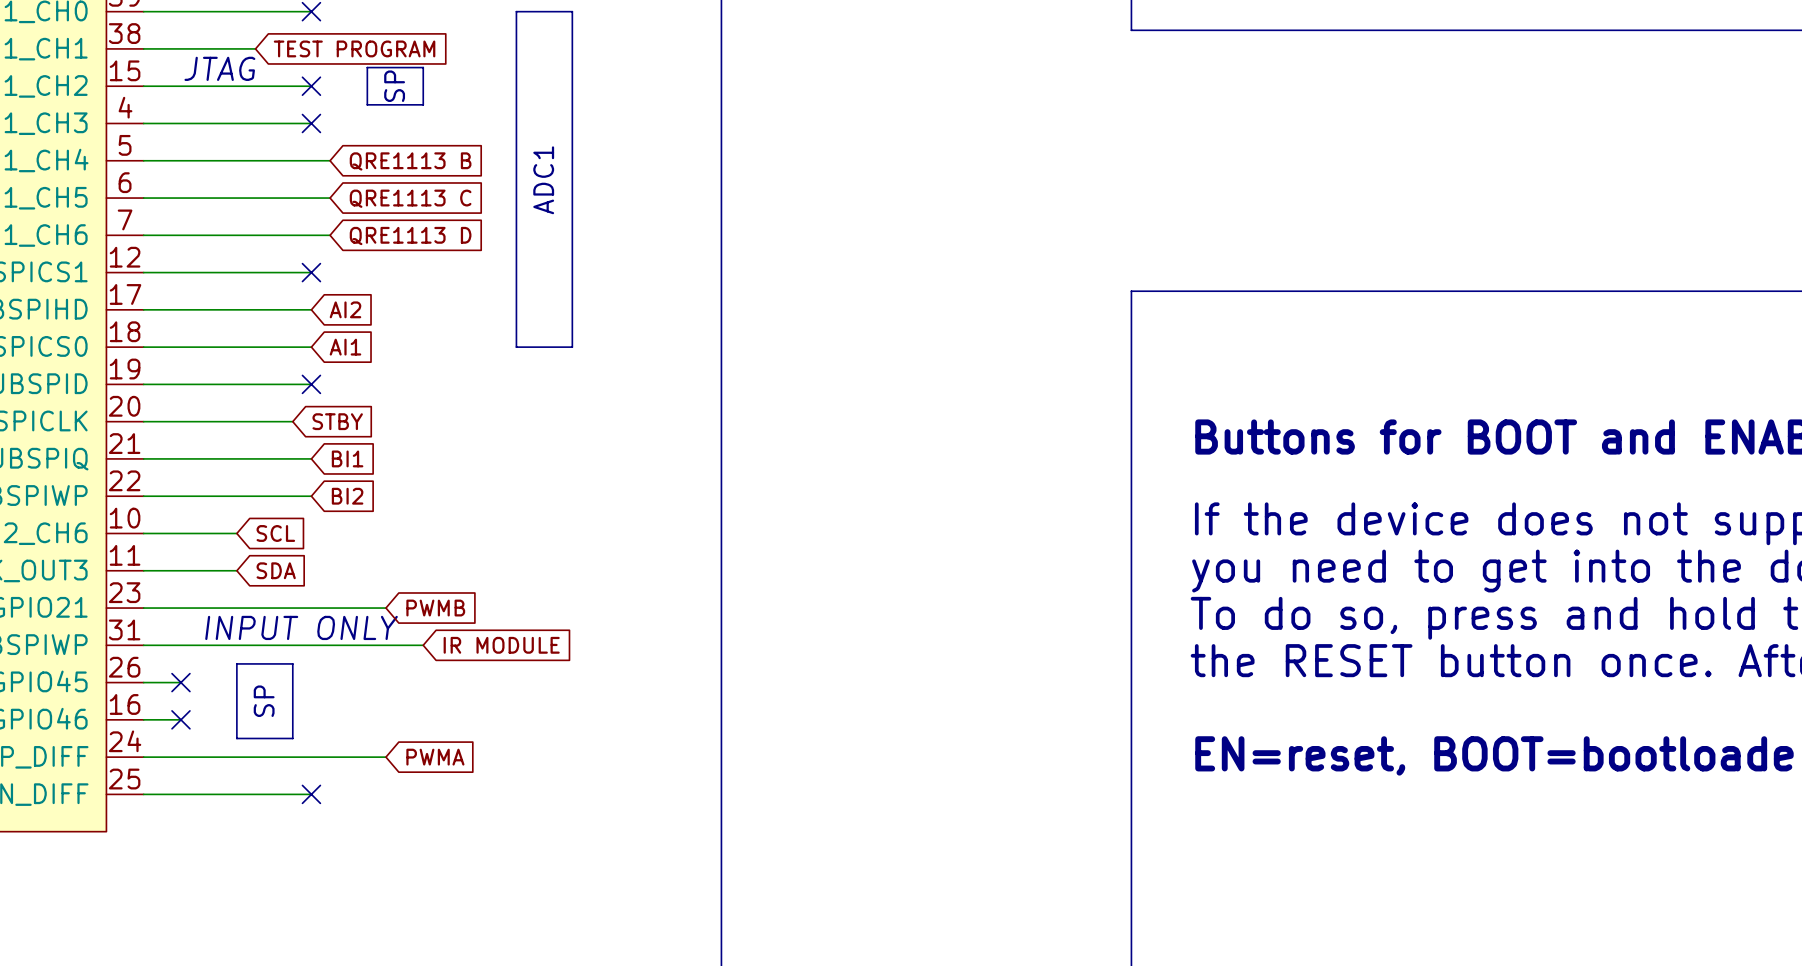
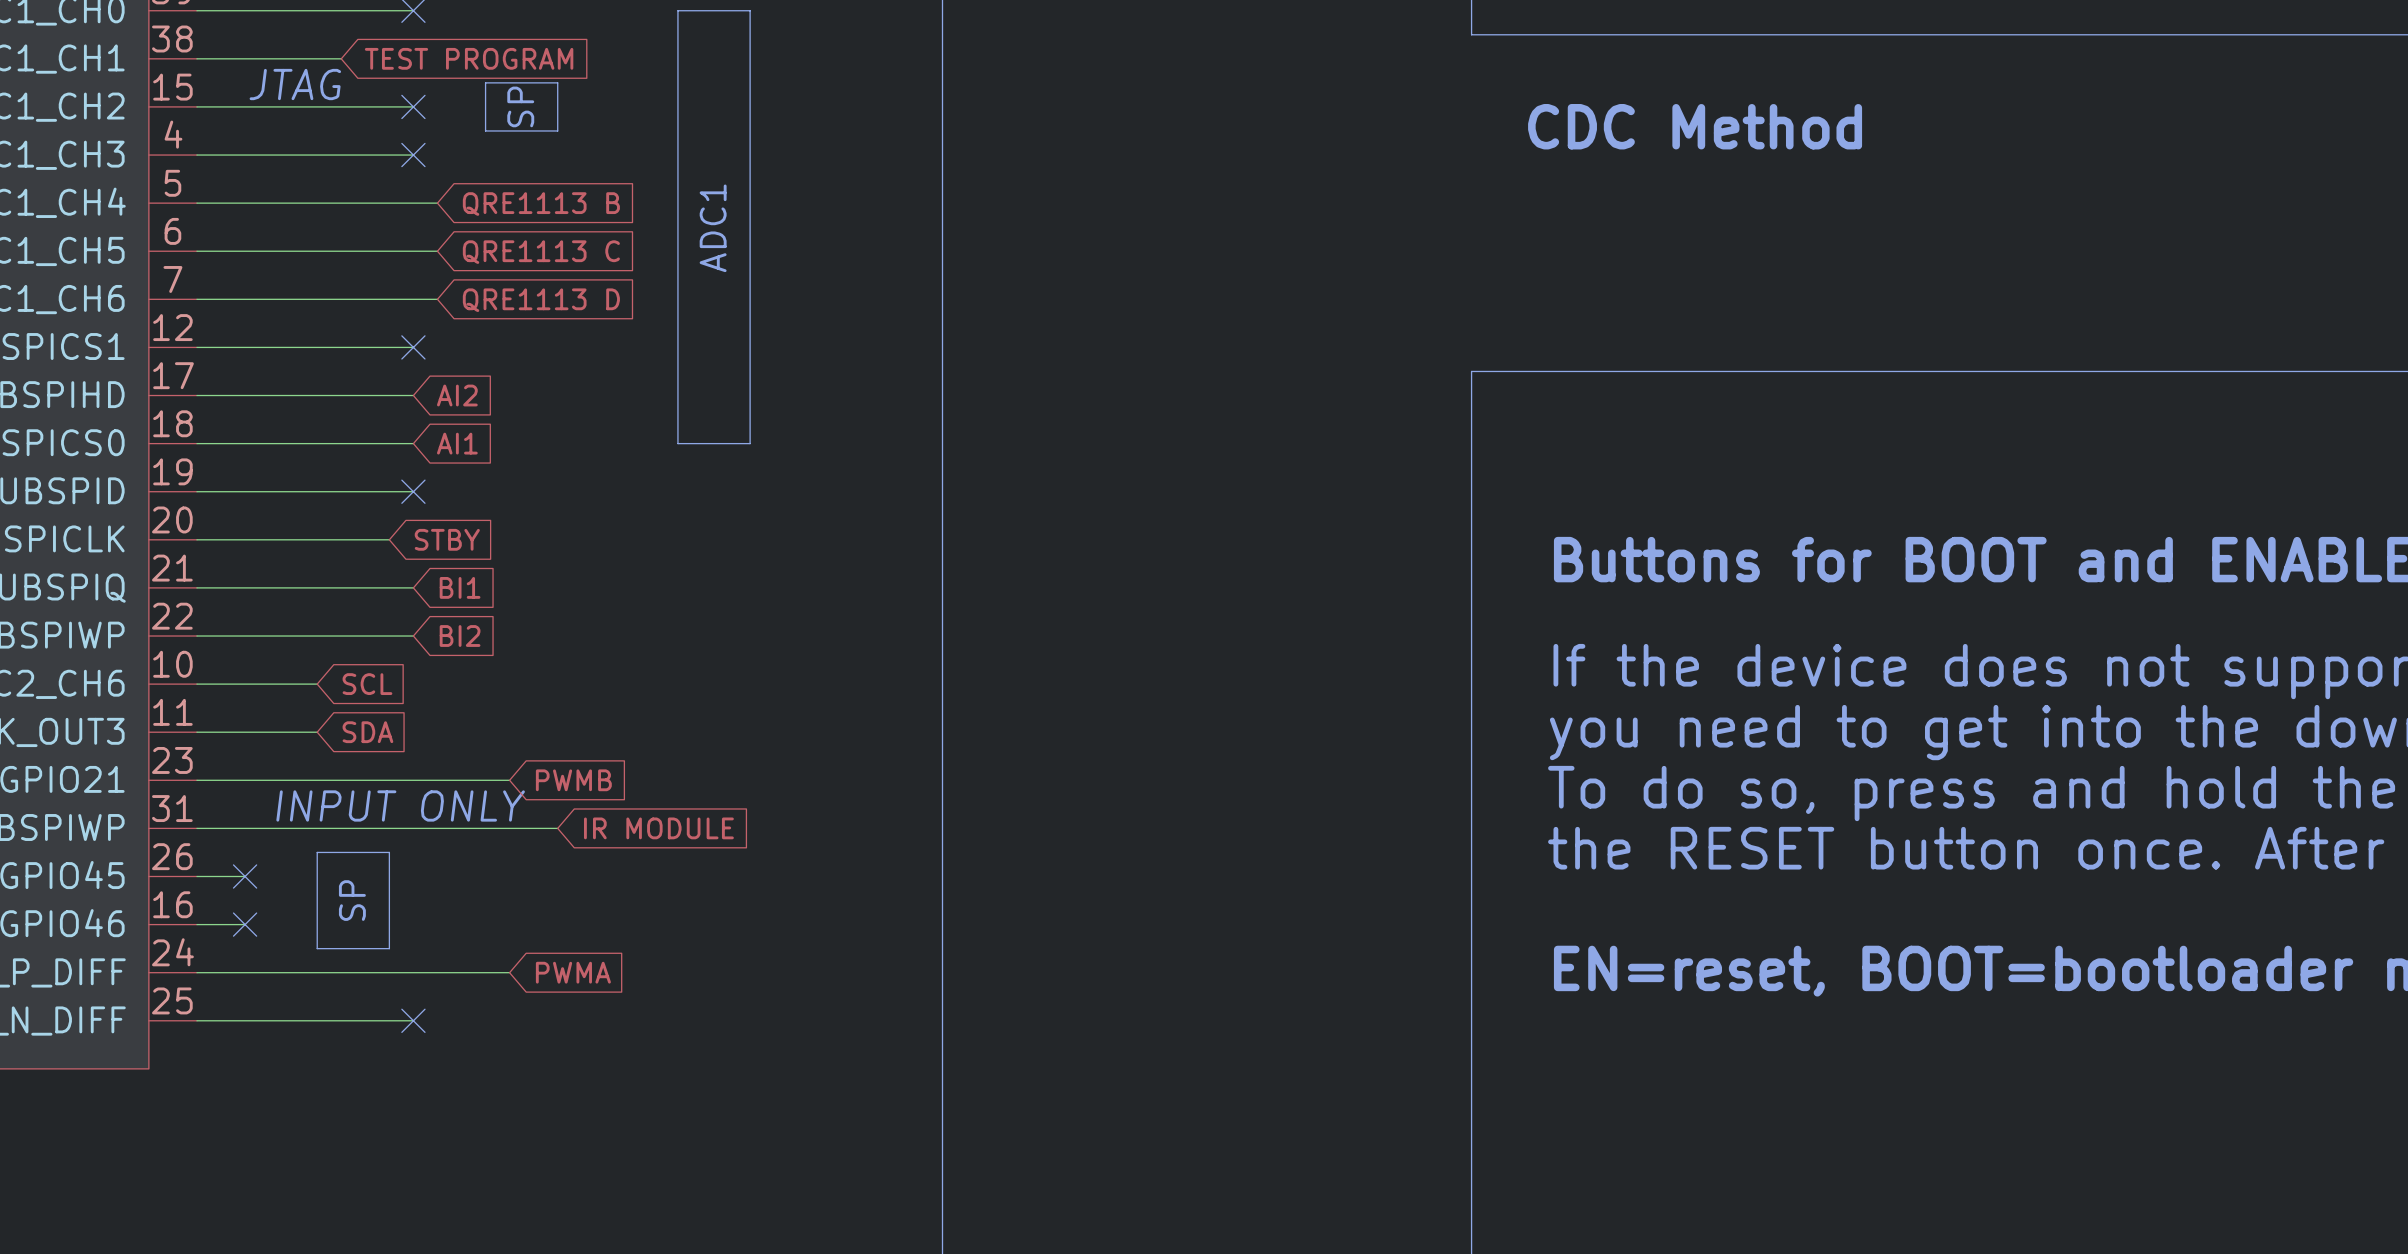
text: none -> CDC Method (1695, 126)

